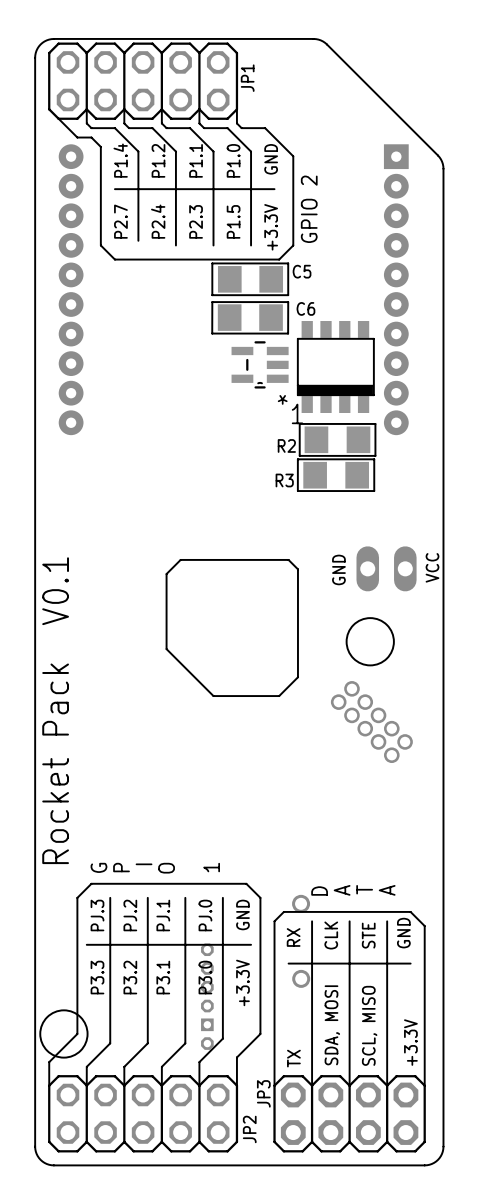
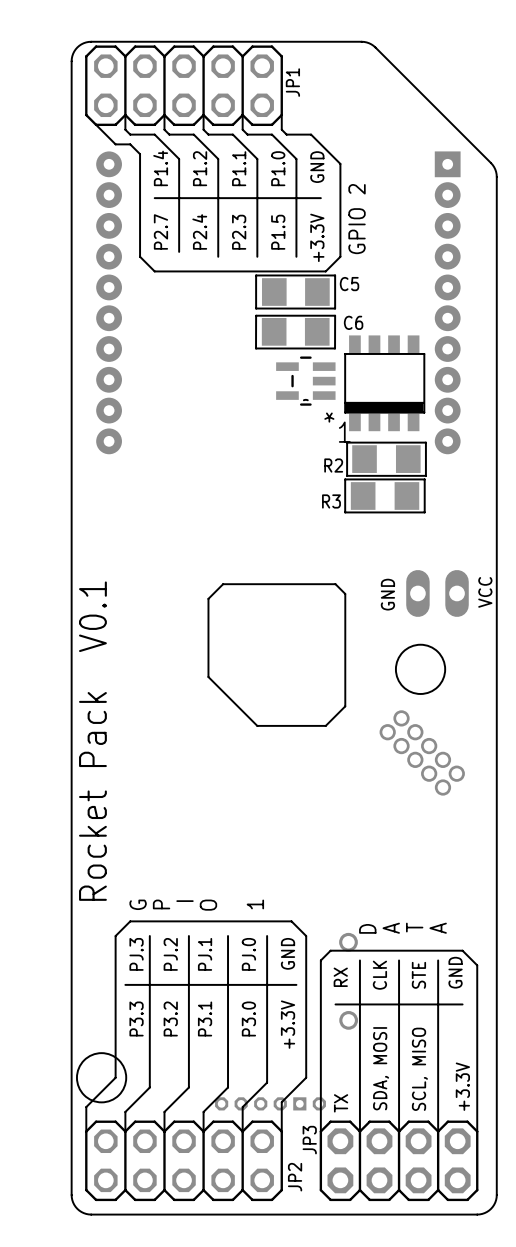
part rotation: 0° (207, 996) -> 90° counterclockwise (270, 1103)
part position: (207, 996) -> (270, 1103)

